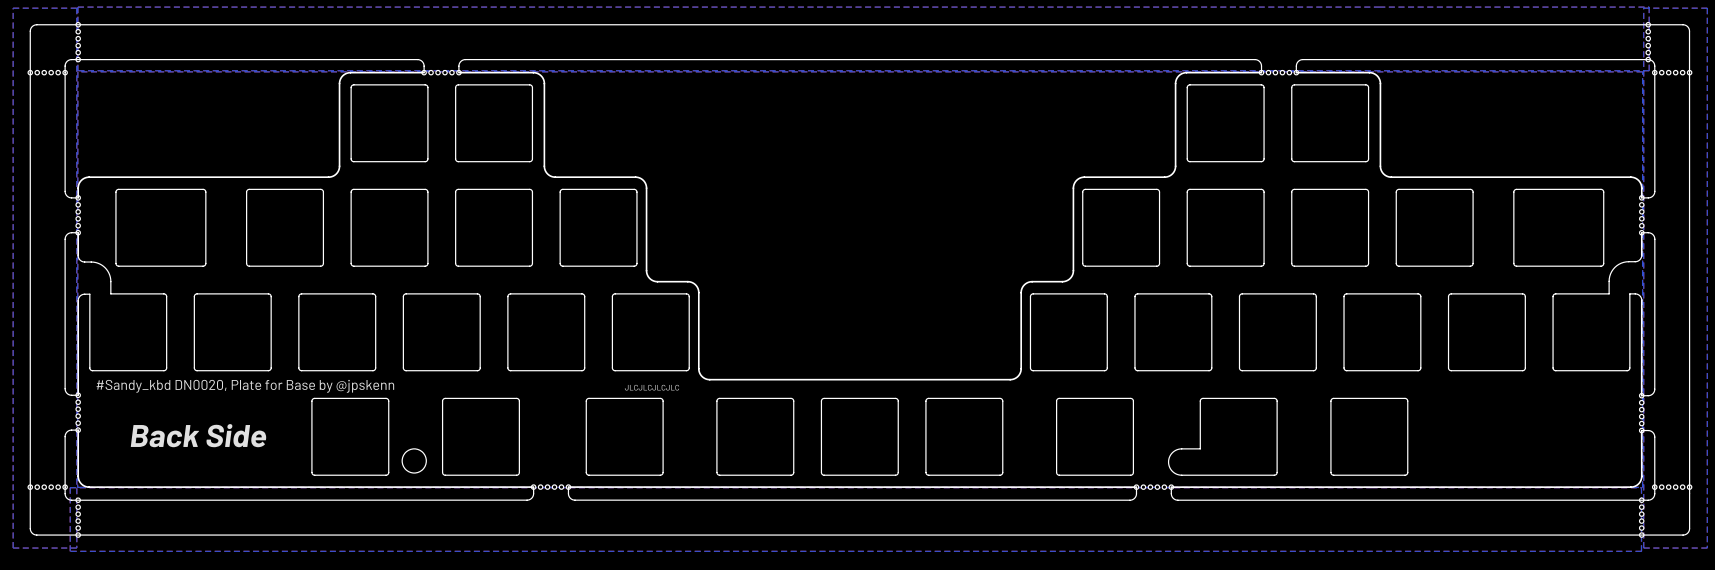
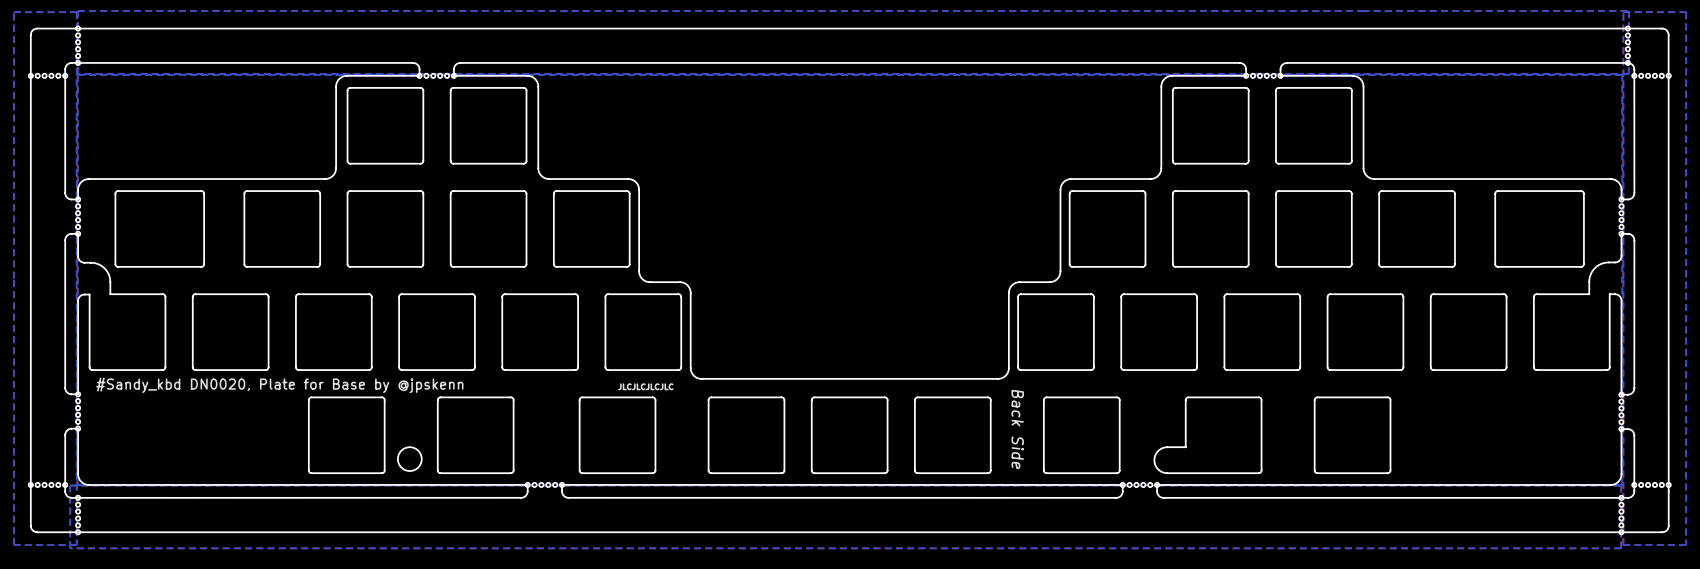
text: none -> Back Side (1017, 429)
text: Back Side (198, 435) -> none

